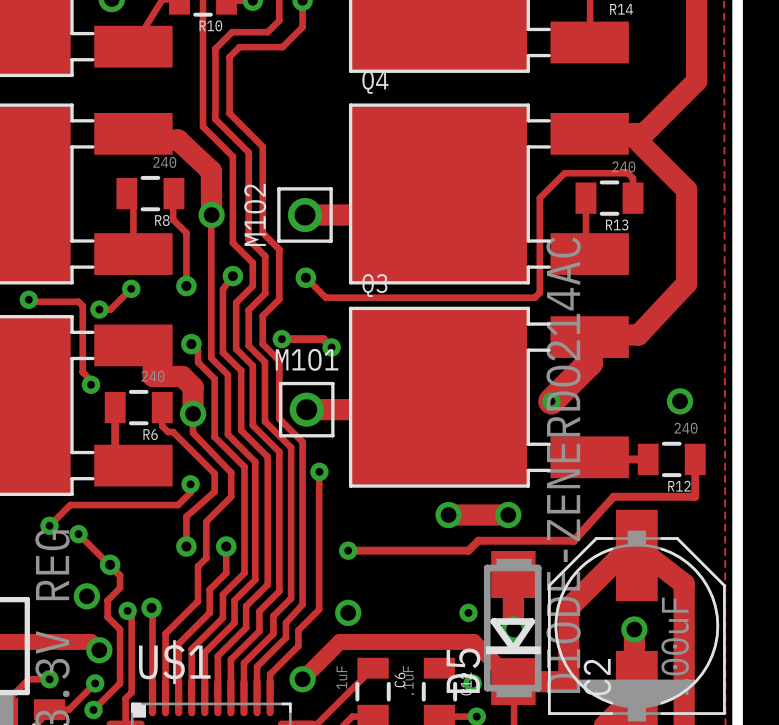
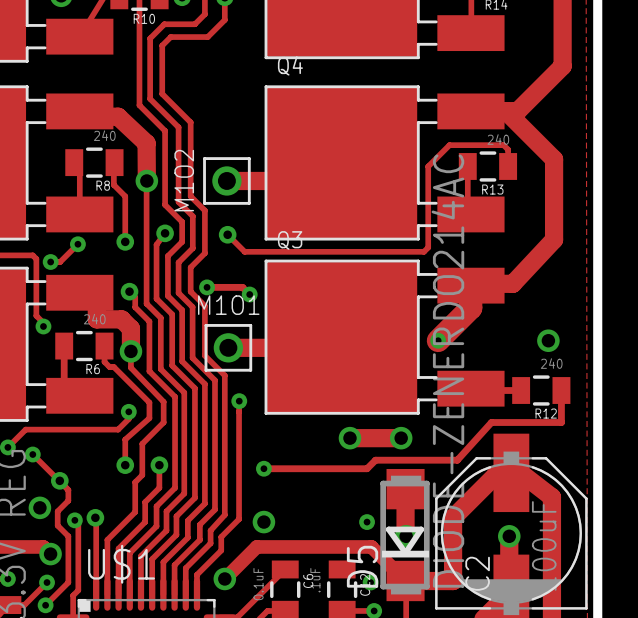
C6 value: 1uF (341, 677) -> 0.1uF (258, 584)

